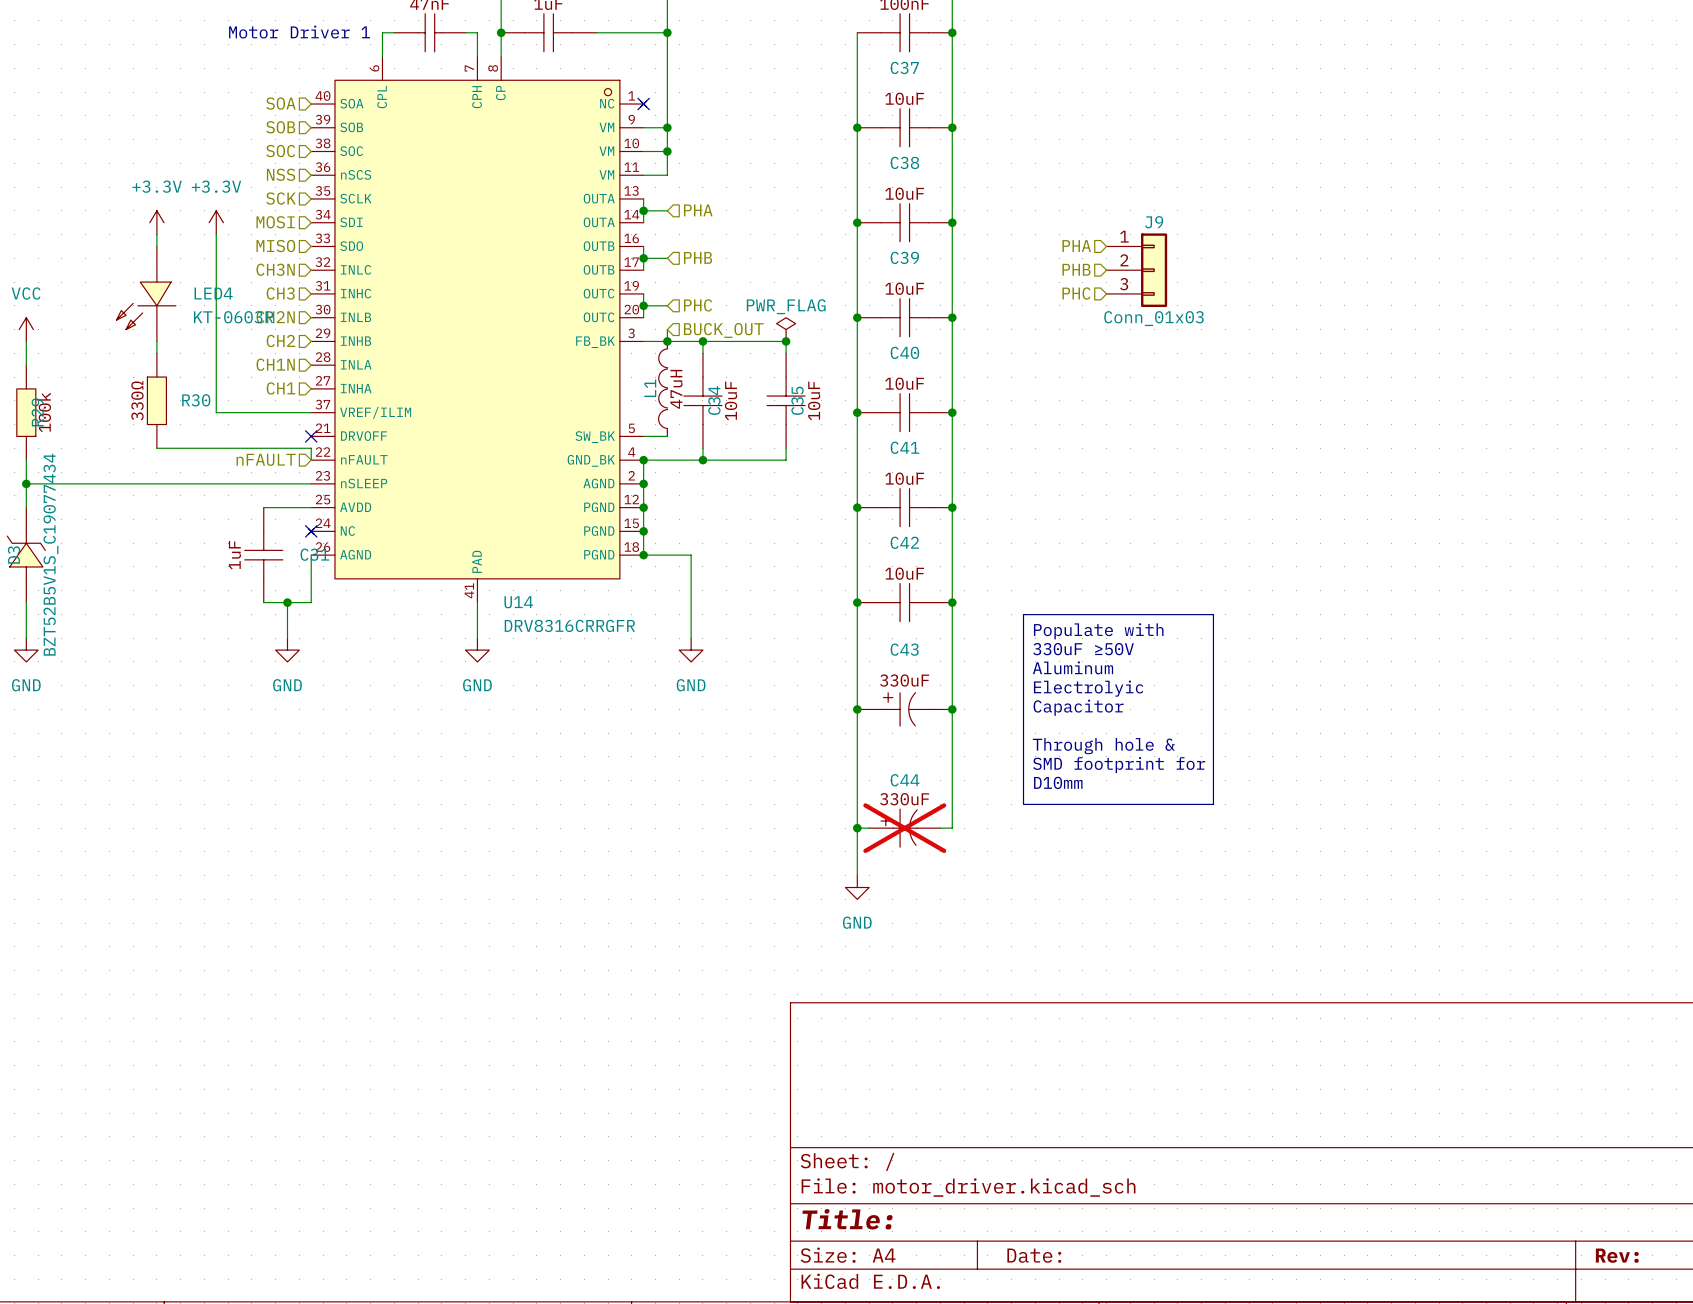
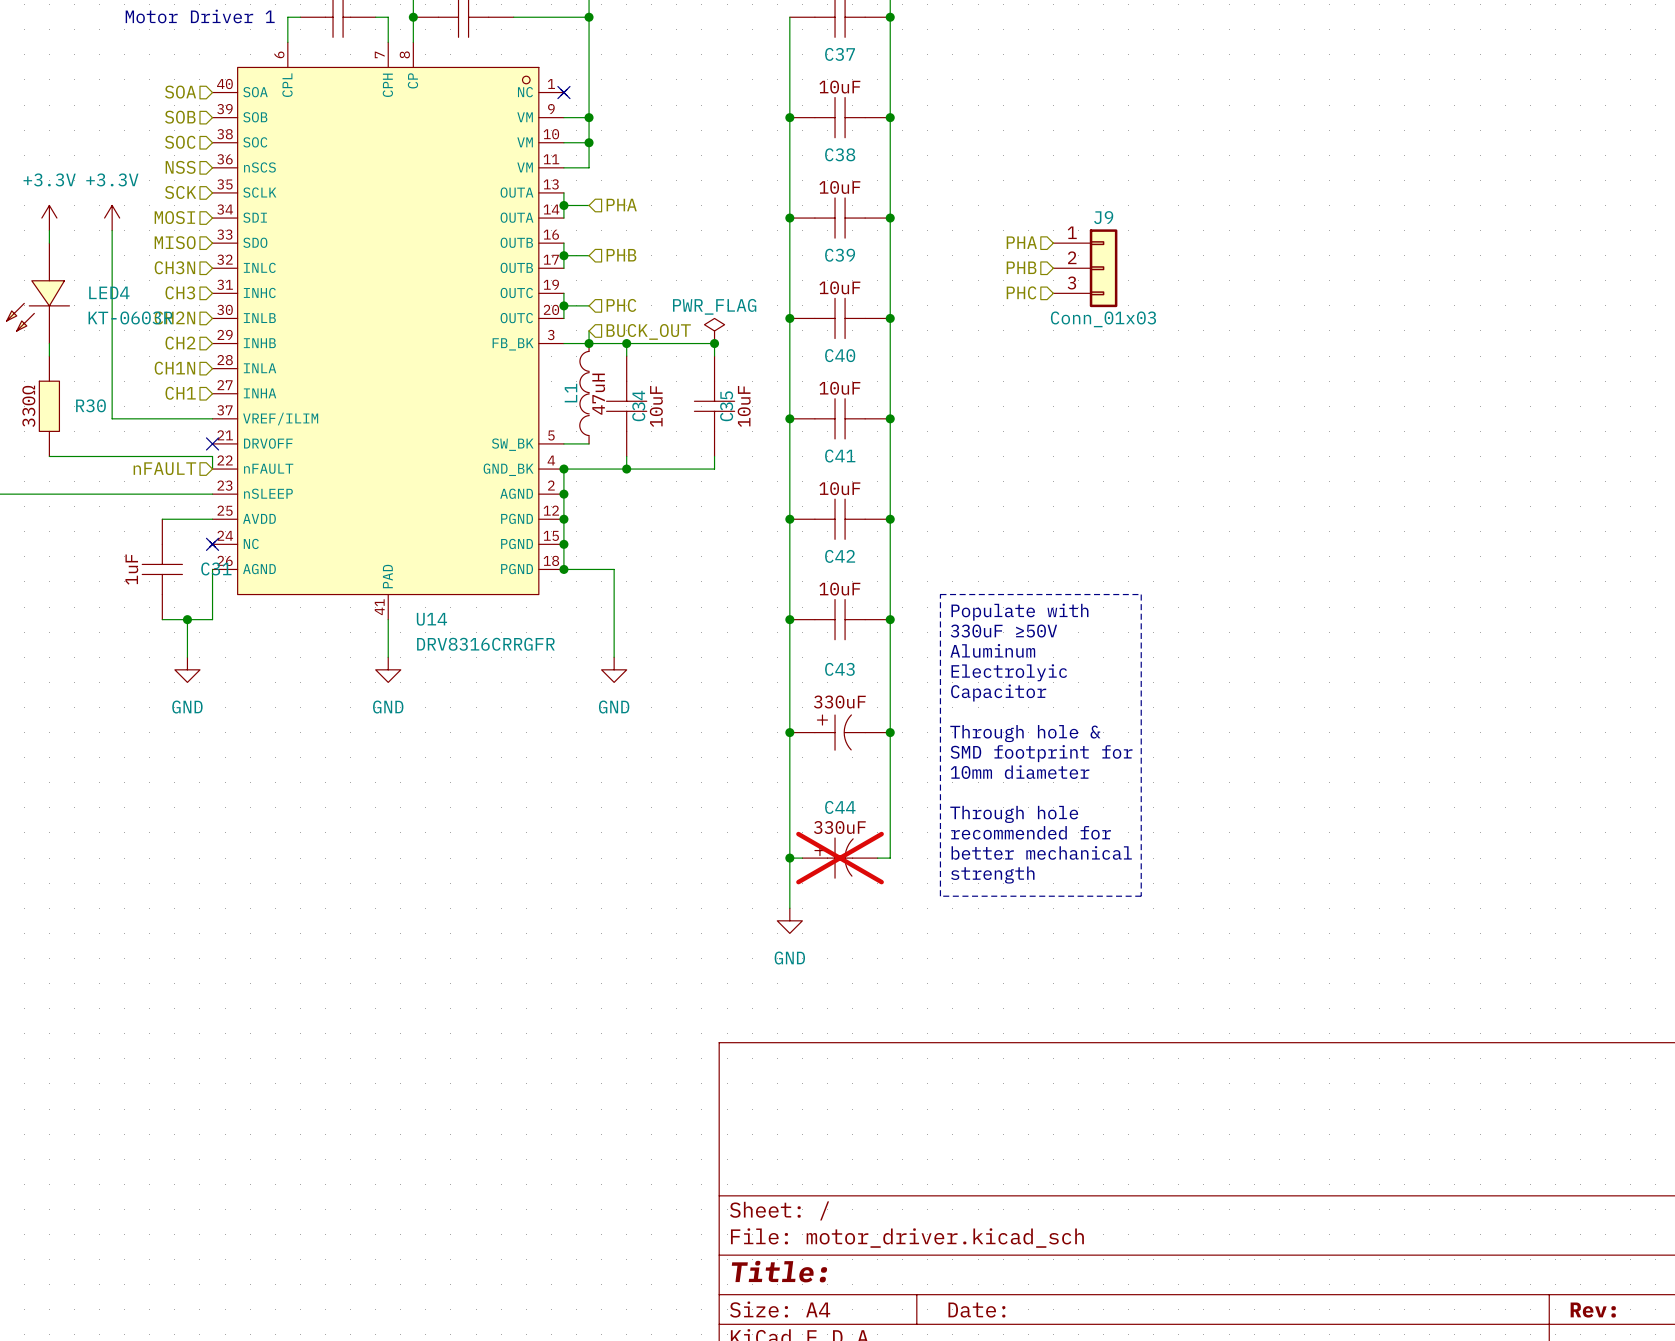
line: (1023, 614) (1213, 614) (1213, 804) (1023, 804) (1023, 614) -> (940, 594) (940, 896) (1141, 896) (1141, 594) (940, 594)
text position: Populate with (1098, 631) -> Populate with (1019, 612)
text position: 330uF ≥50V (1083, 649) -> 330uF ≥50V (1003, 631)
text position: Aluminum (1073, 667) -> Aluminum (992, 650)
text position: Electrolyic (1088, 688) -> Electrolyic (1009, 672)
text position: Capacitor (1078, 707) -> Capacitor (998, 692)
text: none -> 10mm diameter (1020, 772)
text position: Through hole & (1103, 746) -> Through hole & (1025, 733)
text position: SMD footprint for (1119, 765) -> SMD footprint for (1041, 753)
text: D10mm (1058, 782) -> none
text: none -> Through hole (1014, 814)
text: none -> recommended for (1031, 832)
text: none -> better mechanical (1041, 852)
text: none -> strength (992, 875)

